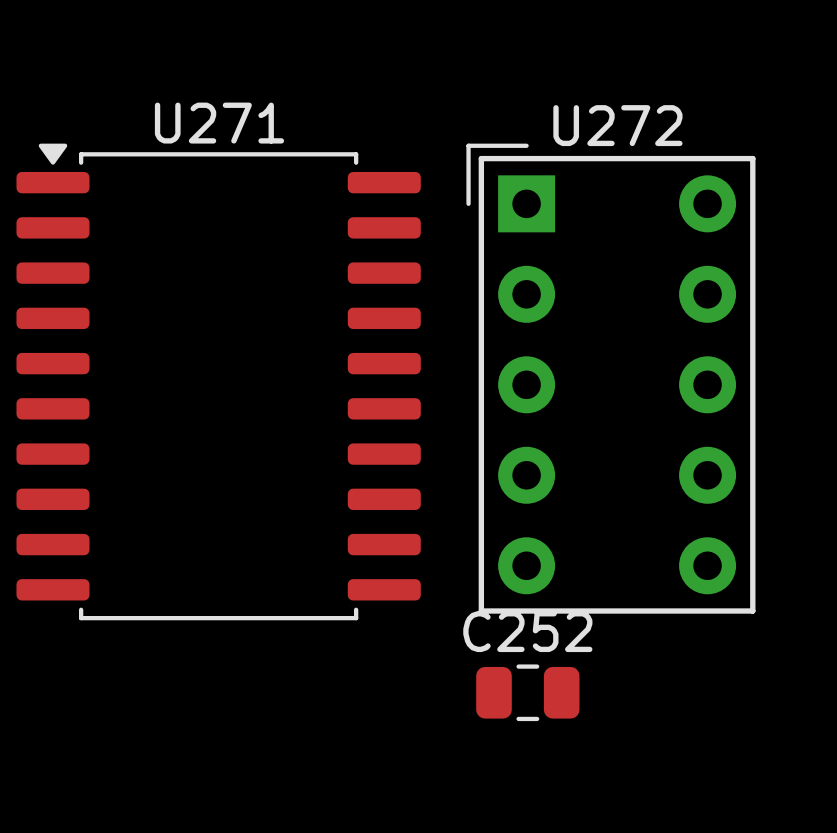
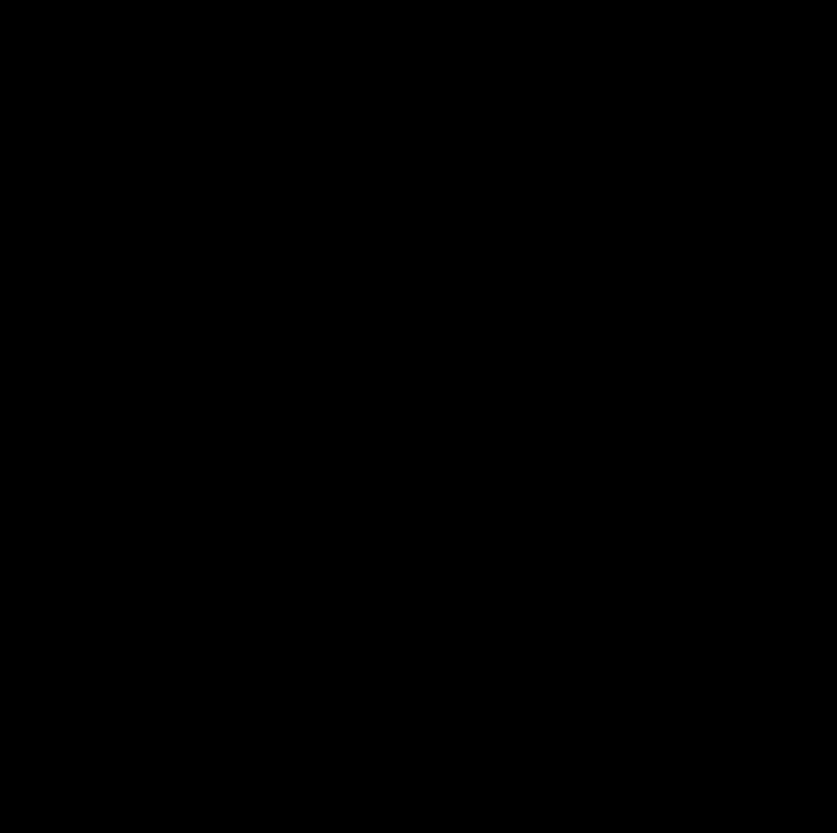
U272: (610, 378) -> none
U271: (218, 381) -> none
C252: (527, 692) -> none

